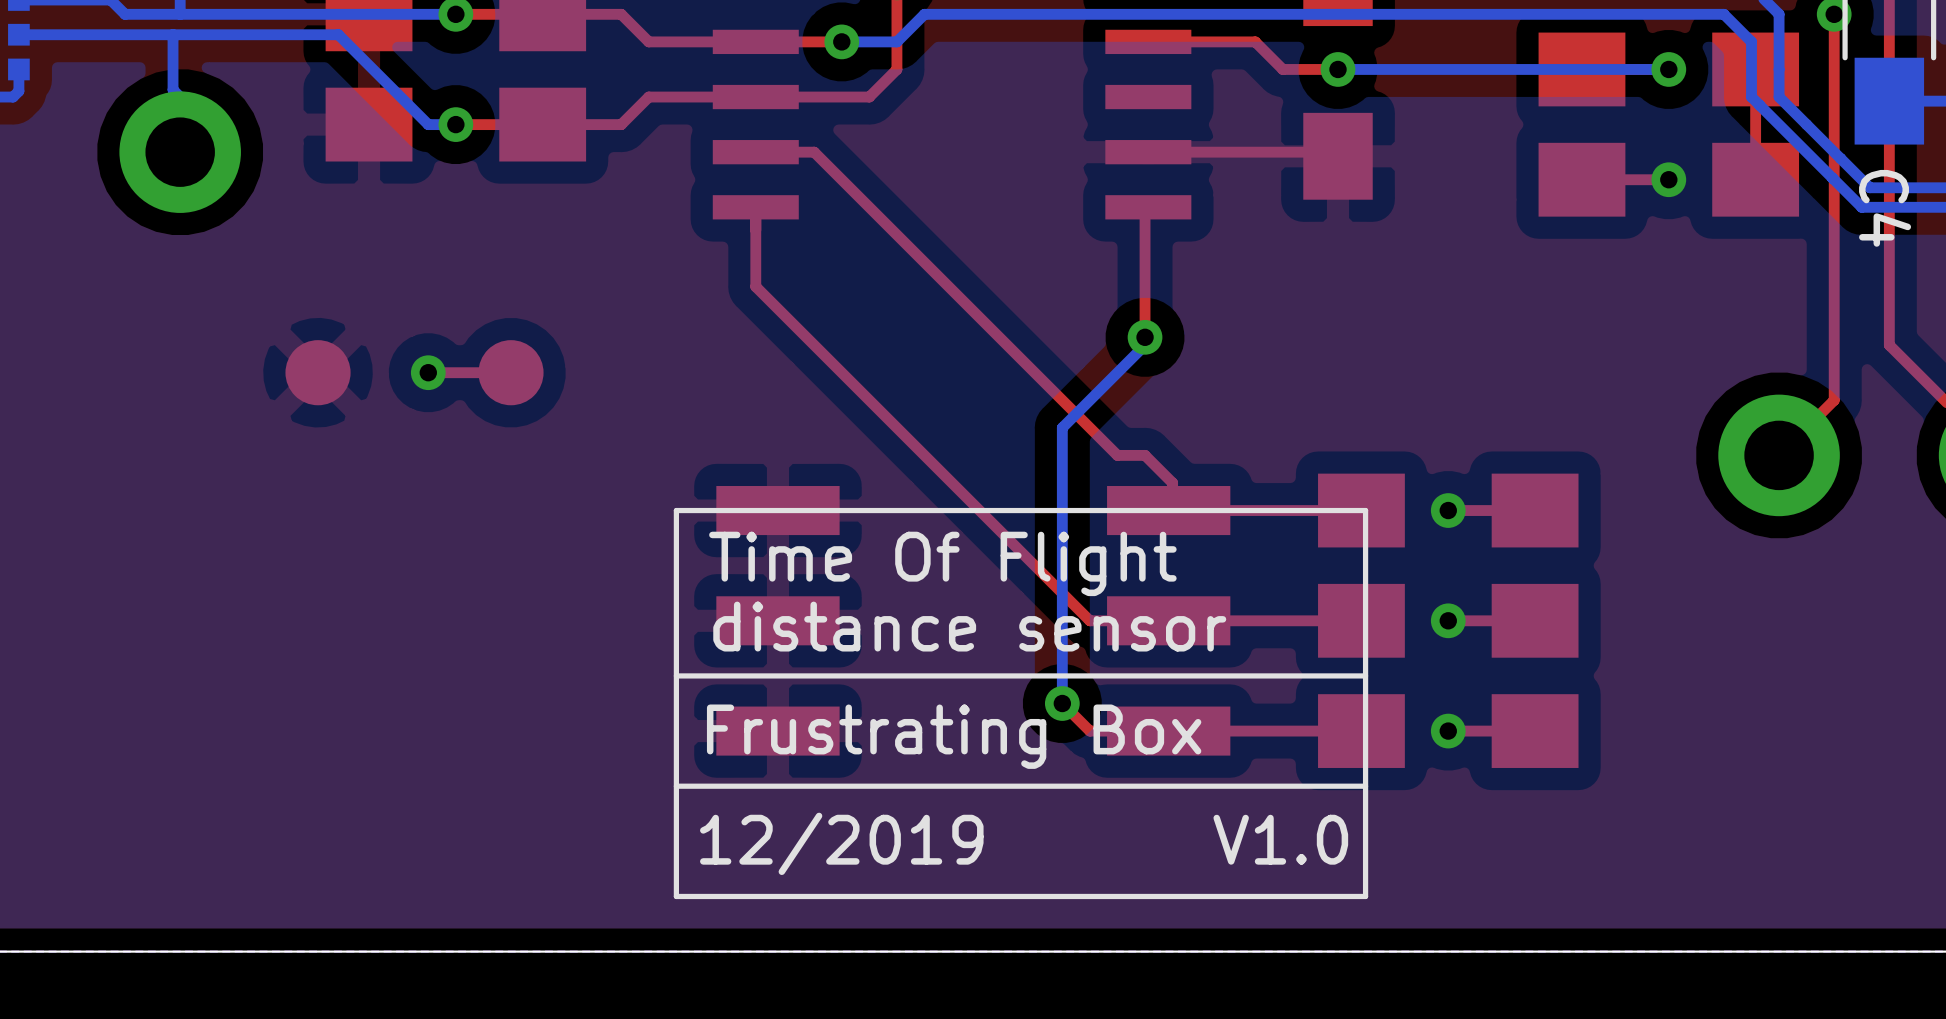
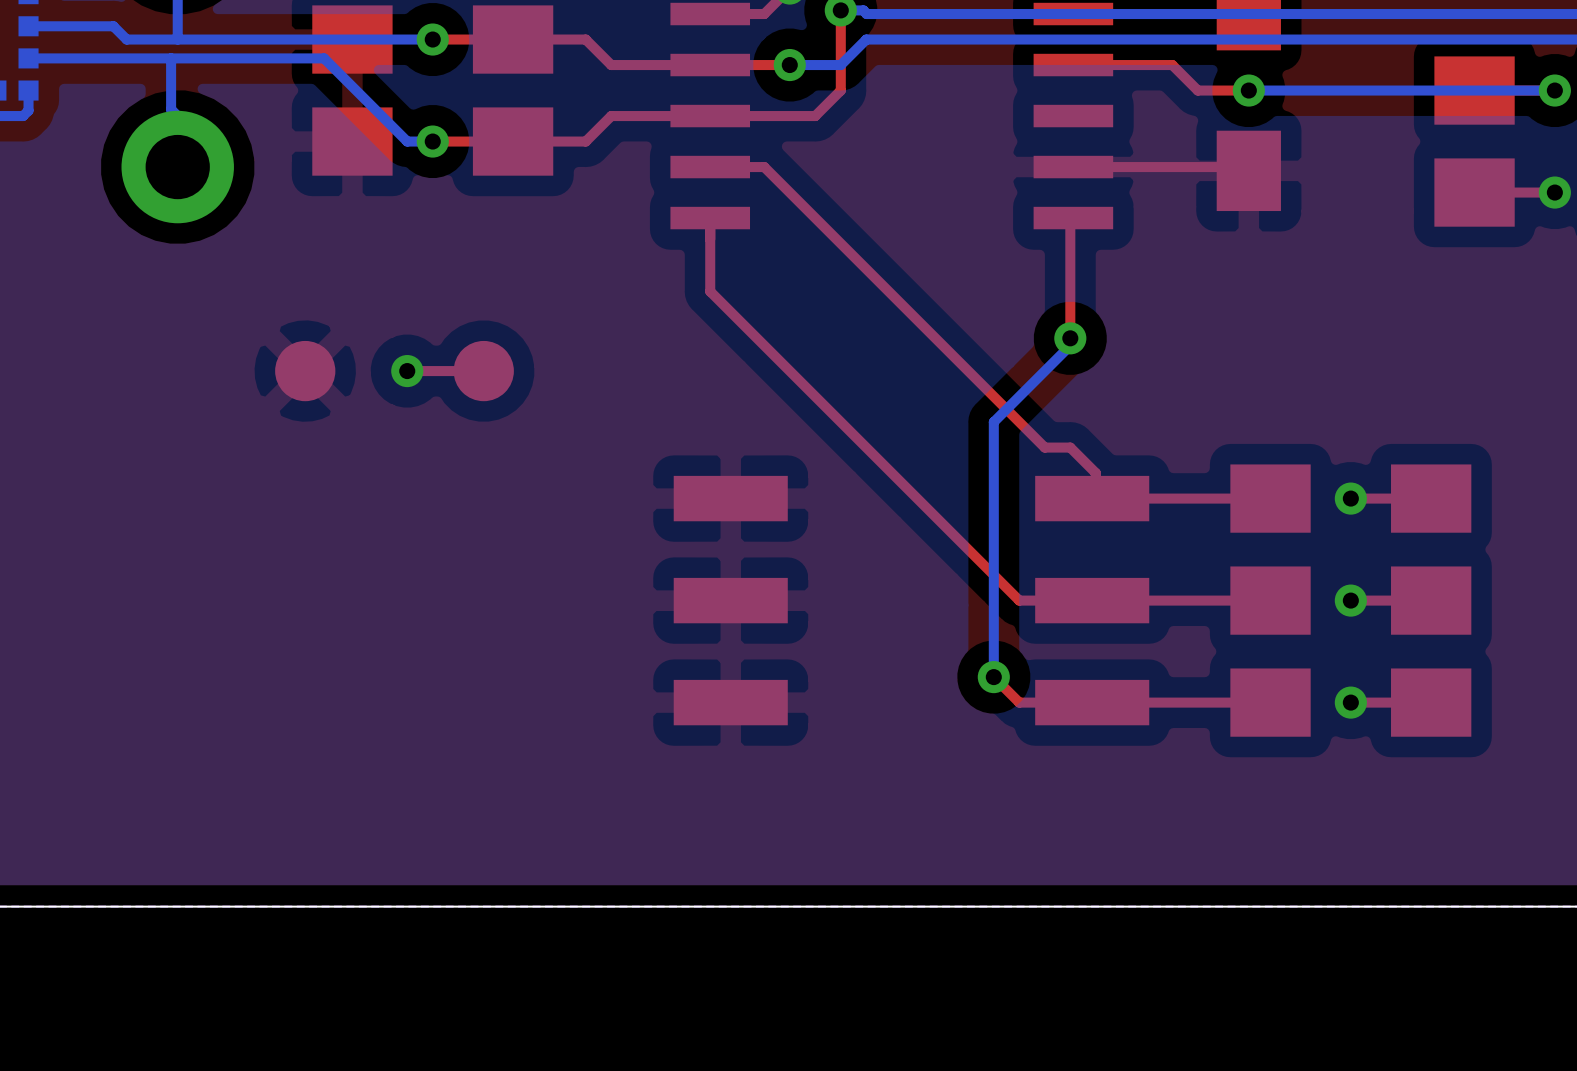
line: (1365, 510) (676, 510) (676, 896) (1365, 896) (1365, 510) -> none
text: Time Of Flight (942, 563) -> none
text: distance sensor (969, 626) -> none
line: (1365, 675) (676, 675) -> none
text: Frustrating Box (954, 736) -> none
line: (1365, 786) (676, 786) -> none
text: V1.0 (1280, 839) -> none
text: 12/2019 (841, 843) -> none

